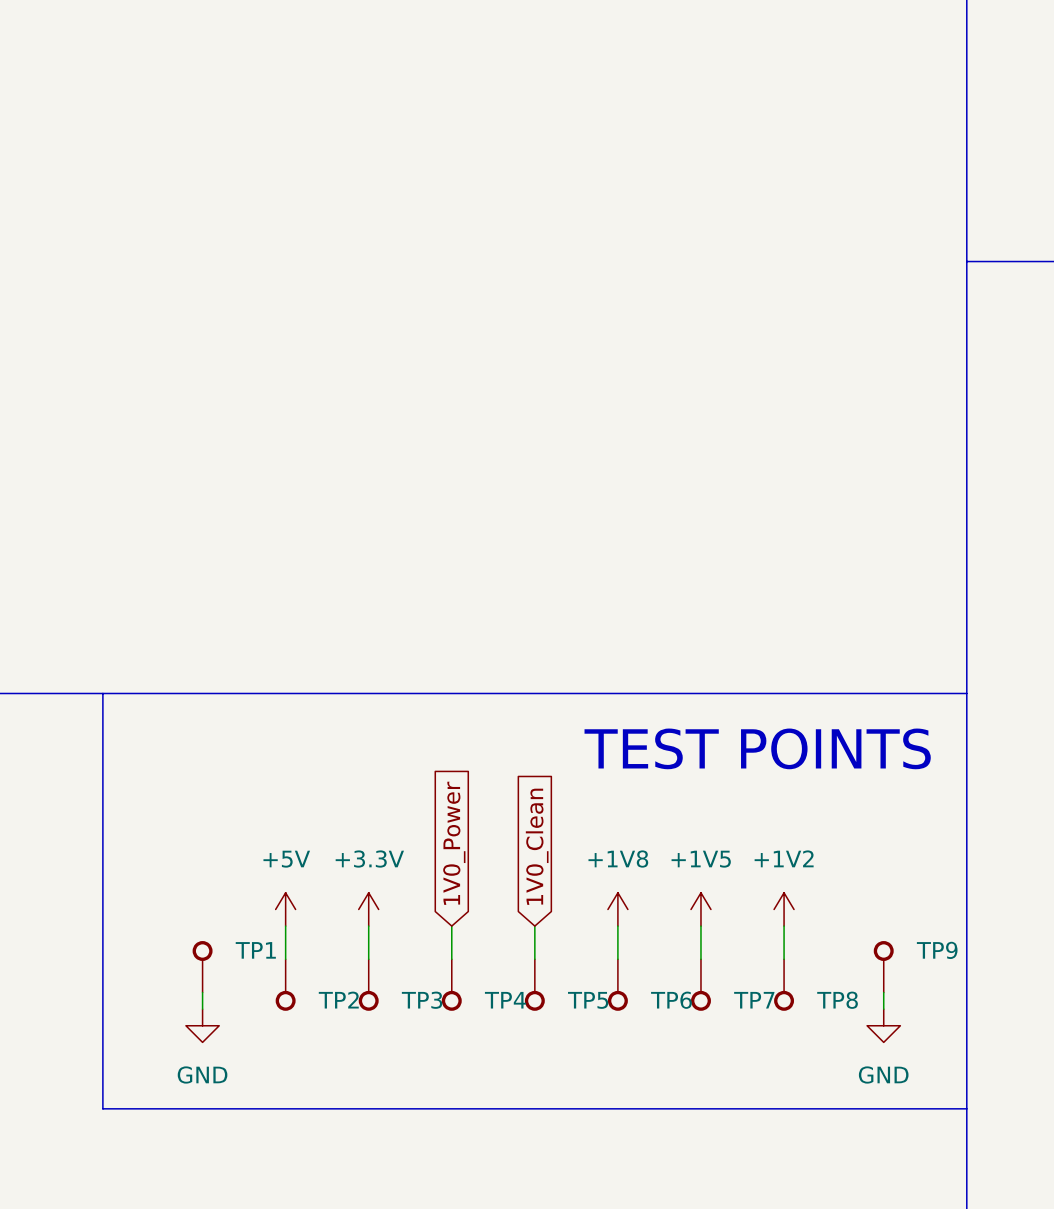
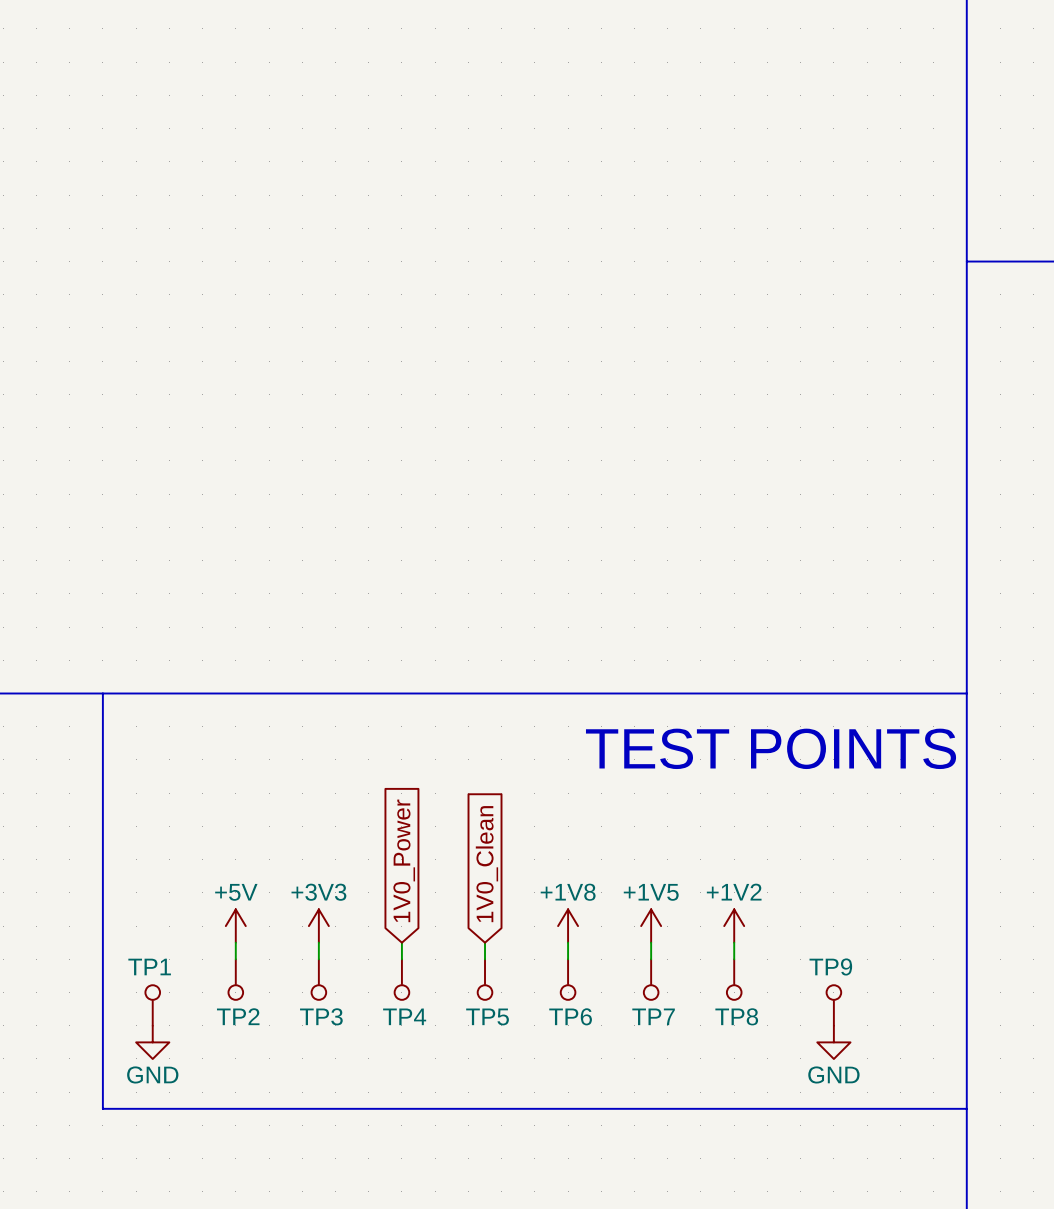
global label position: 1V0_Power (454, 843) -> 1V0_Power (404, 860)
global label position: 1V0_Clean (537, 846) -> 1V0_Clean (486, 864)
power symbol text position: +1V2 (784, 858) -> +1V2 (734, 892)
power symbol text position: +5V (286, 859) -> +5V (236, 892)
power symbol text position: +1V8 (618, 859) -> +1V8 (568, 892)
power symbol text position: +1V5 (701, 859) -> +1V5 (651, 892)
power symbol position: +5V (285, 909) -> +5V (235, 926)
power symbol: +3.3V (368, 909) -> none
power symbol position: +1V8 (617, 909) -> +1V8 (568, 926)
power symbol position: +1V5 (700, 909) -> +1V5 (651, 926)
power symbol position: +1V2 (784, 909) -> +1V2 (734, 926)
wire: (285, 926) (285, 959) -> none
power symbol: none -> +3V3 (318, 926)
wire: (368, 926) (368, 959) -> none
wire: (451, 926) (451, 959) -> none
wire: (534, 926) (534, 959) -> none
wire: (617, 926) (617, 959) -> none
wire: (700, 926) (700, 959) -> none
wire: (784, 926) (784, 959) -> none
TP1 symbol: [192, 941, 213, 993] -> [145, 985, 161, 1026]
TP9 symbol: [873, 941, 894, 993] -> [826, 985, 842, 1026]
wire: none -> (318, 942) (318, 959)
wire: none -> (401, 942) (401, 959)
wire: none -> (485, 942) (485, 959)
wire: none -> (568, 942) (568, 959)
wire: none -> (651, 942) (651, 959)
TP1 name position: TP1 (255, 950) -> TP1 (149, 966)
TP9 name position: TP9 (937, 950) -> TP9 (830, 966)
TP2 symbol: [275, 959, 296, 1011] -> [228, 959, 244, 1000]
TP3 symbol: [358, 959, 379, 1011] -> [311, 959, 327, 1000]
TP4 symbol: [441, 959, 462, 1011] -> [394, 959, 410, 1000]
TP5 symbol: [524, 959, 545, 1011] -> [477, 959, 493, 1000]
TP6 symbol: [607, 959, 628, 1011] -> [560, 959, 576, 1000]
TP7 symbol: [691, 959, 711, 1011] -> [643, 959, 659, 1000]
TP8 symbol: [774, 959, 795, 1011] -> [726, 959, 742, 1000]
wire: (202, 992) (202, 1009) -> (235, 942) (235, 959)
wire: (883, 992) (883, 1009) -> (734, 942) (734, 959)
TP2 name position: TP2 (338, 1000) -> TP2 (238, 1016)
TP3 name position: TP3 (422, 1000) -> TP3 (321, 1016)
TP4 name position: TP4 (505, 1000) -> TP4 (404, 1016)
TP5 name position: TP5 (588, 1000) -> TP5 (487, 1016)
TP6 name position: TP6 (671, 1000) -> TP6 (570, 1016)
TP7 name position: TP7 (754, 1000) -> TP7 (653, 1016)
TP8 name position: TP8 (837, 1000) -> TP8 (736, 1016)
power symbol position: GND (202, 1025) -> GND (152, 1042)
power symbol position: GND (883, 1025) -> GND (833, 1042)
power symbol text position: GND (202, 1074) -> GND (152, 1074)
power symbol text position: GND (883, 1074) -> GND (833, 1074)

